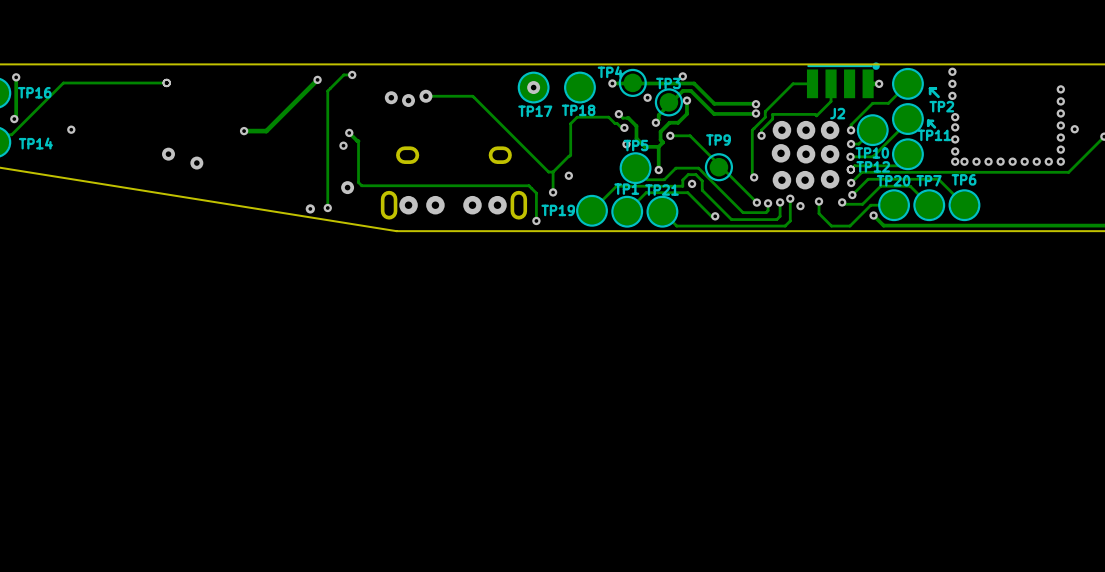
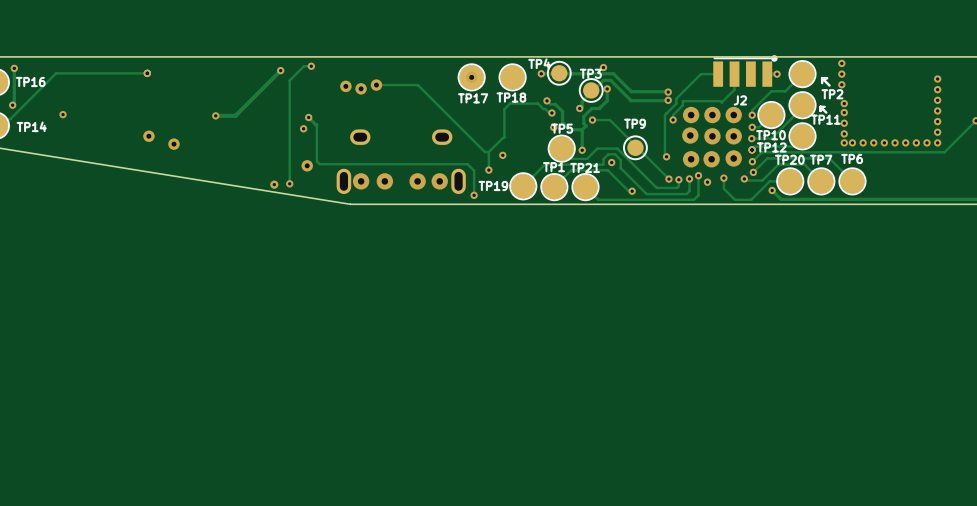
via: (647, 97) -> none
via: (1074, 129) -> none

